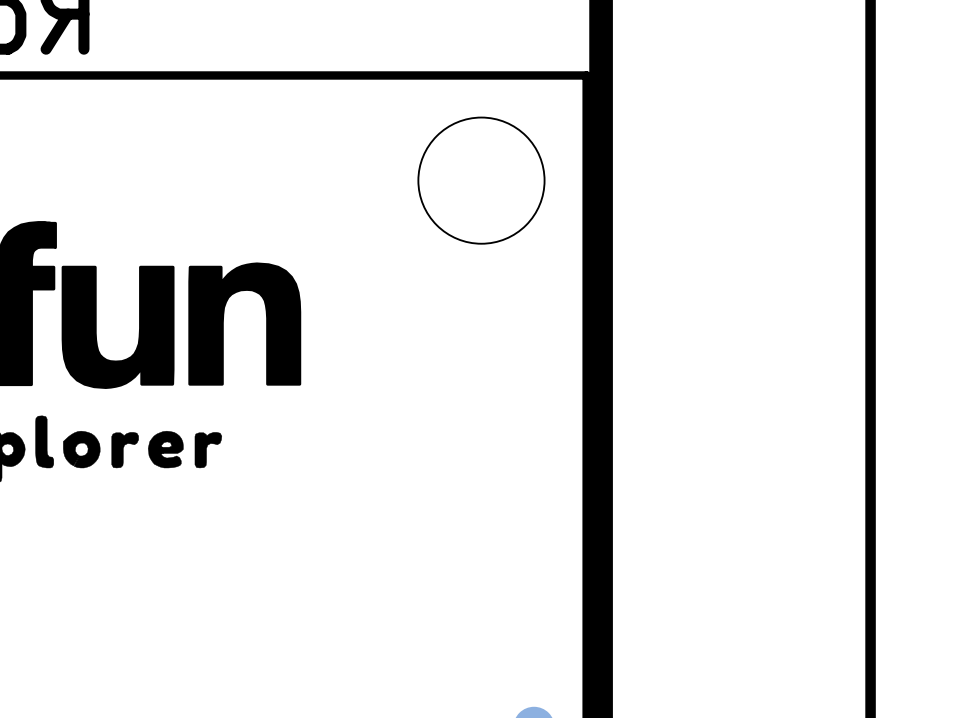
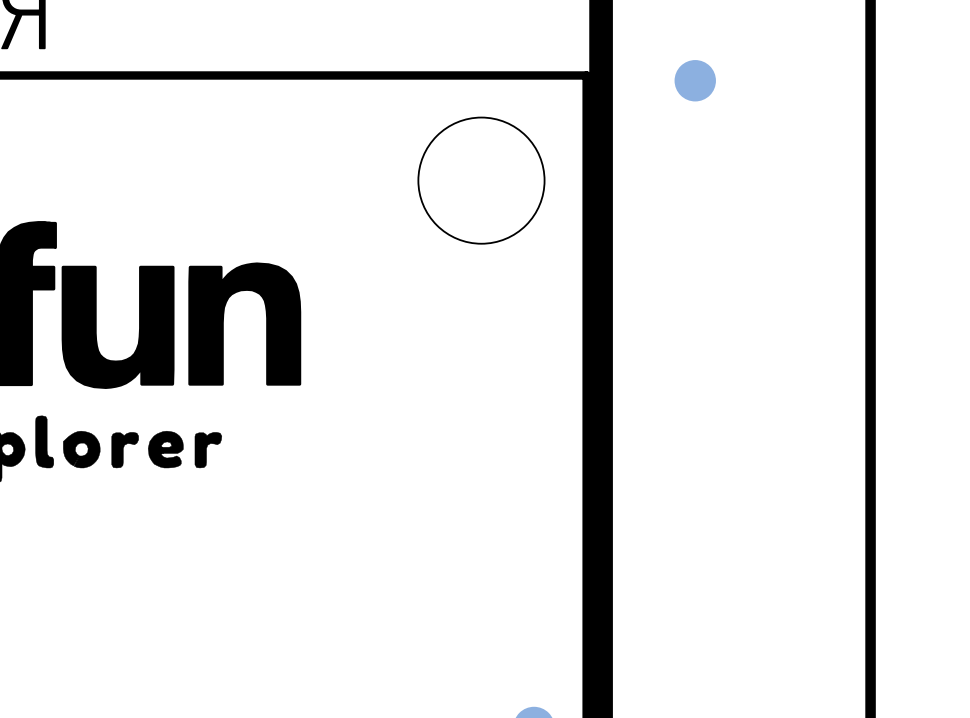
part: none -> (695, 80)

